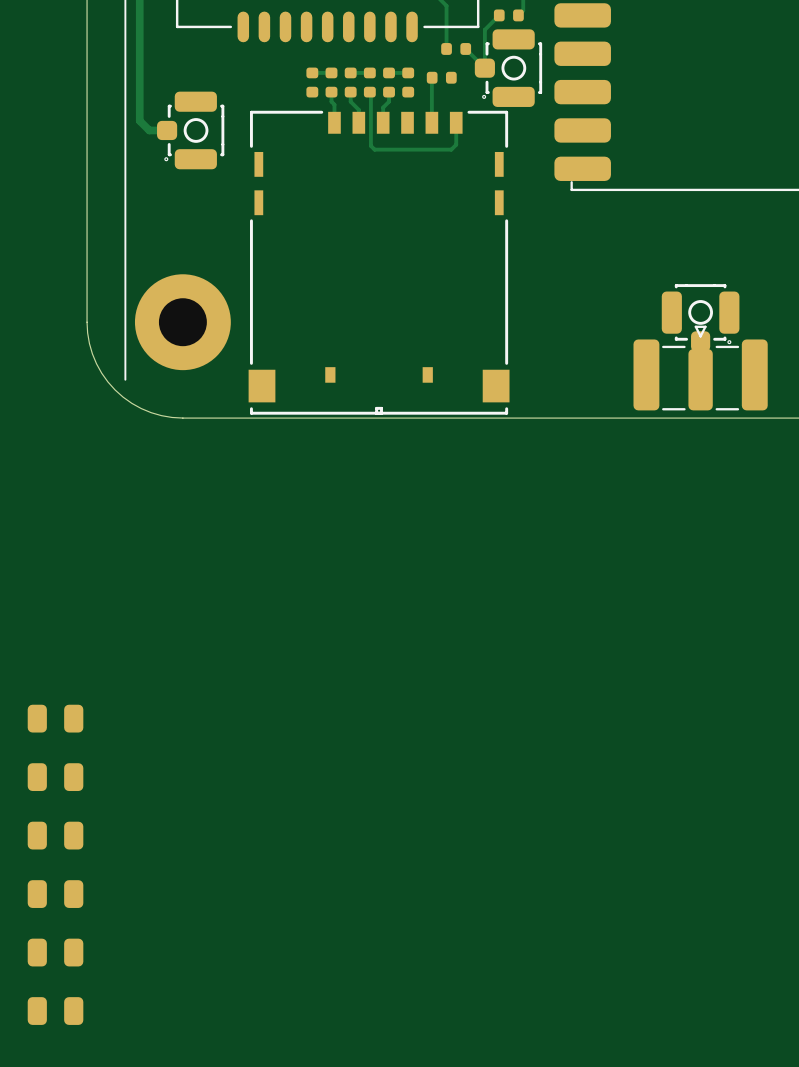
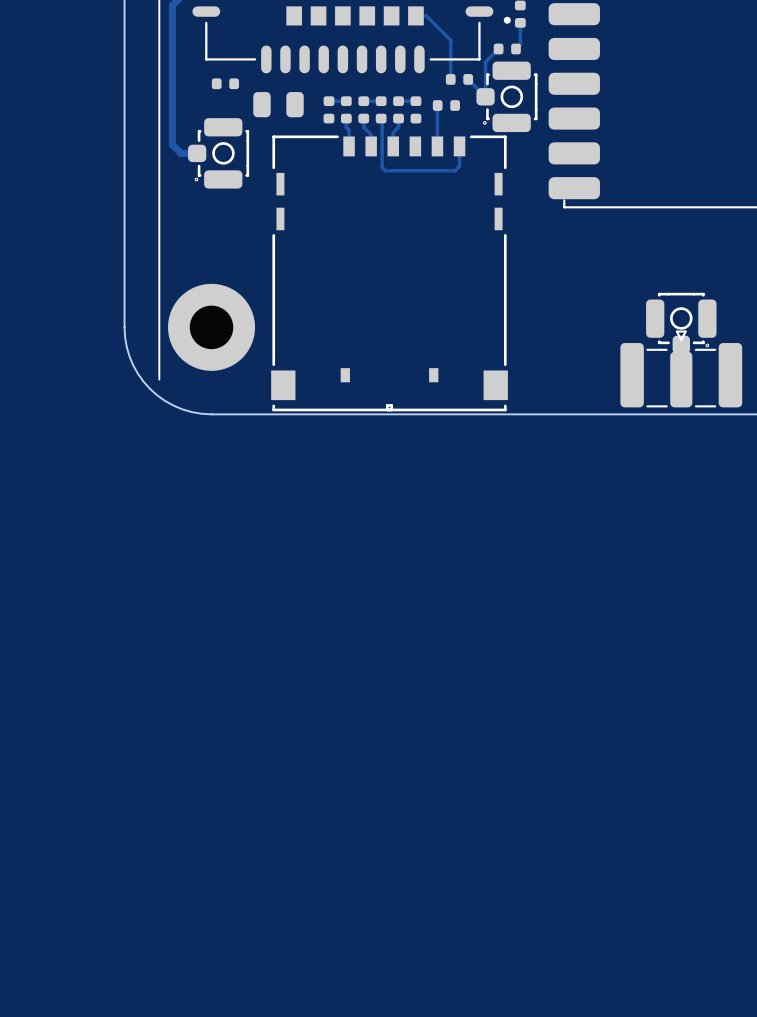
part: none -> (225, 83)
part: none -> (278, 104)
part: (55, 718) -> none
part: (55, 777) -> none
part: (55, 835) -> none
part: (55, 894) -> none
part: (55, 952) -> none
part: (55, 1011) -> none

